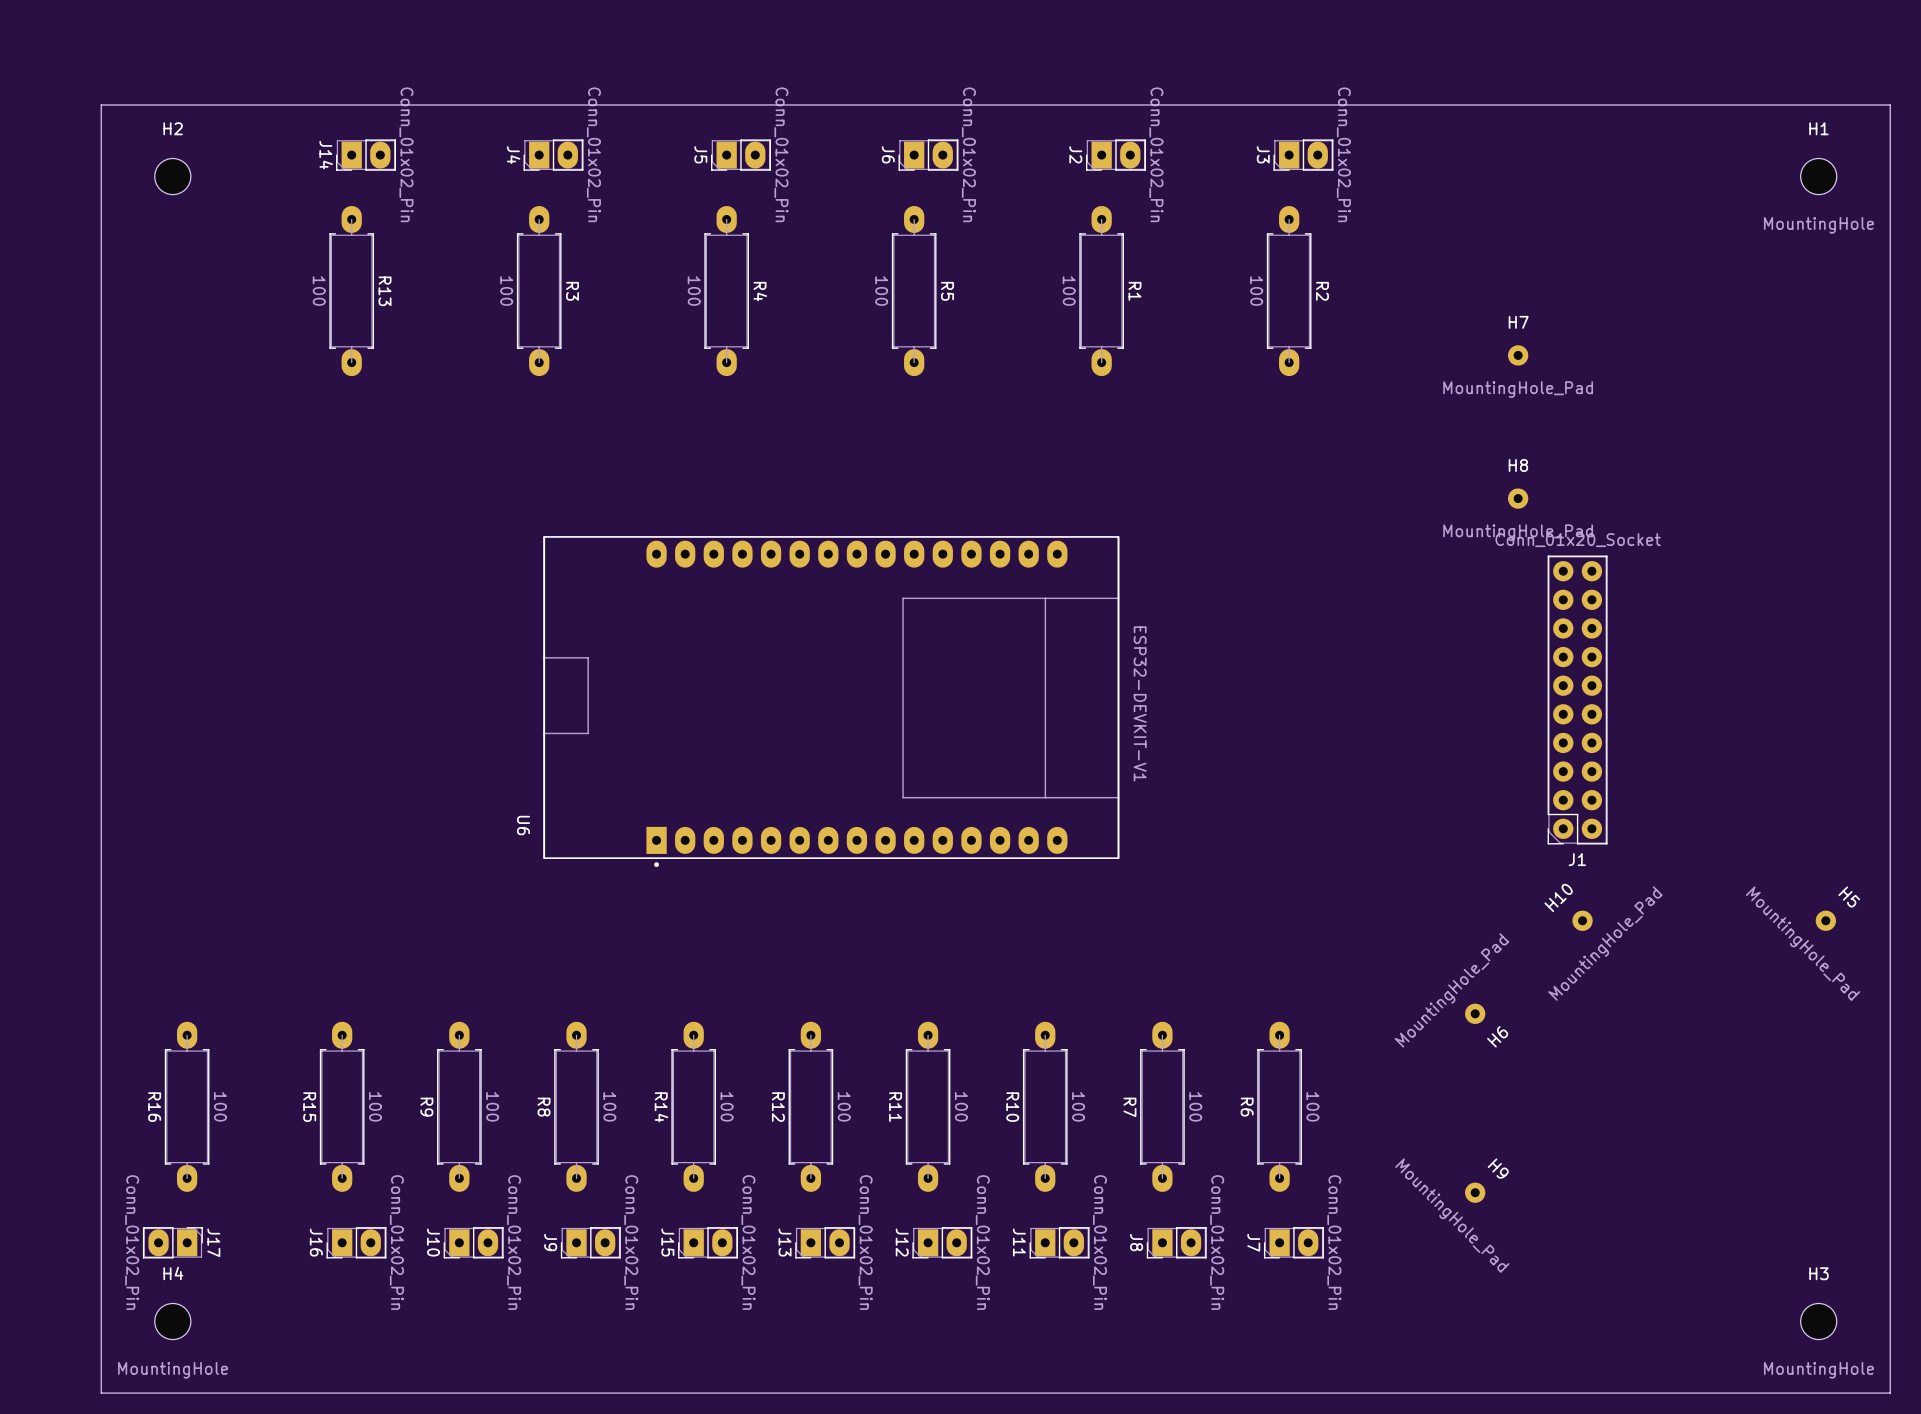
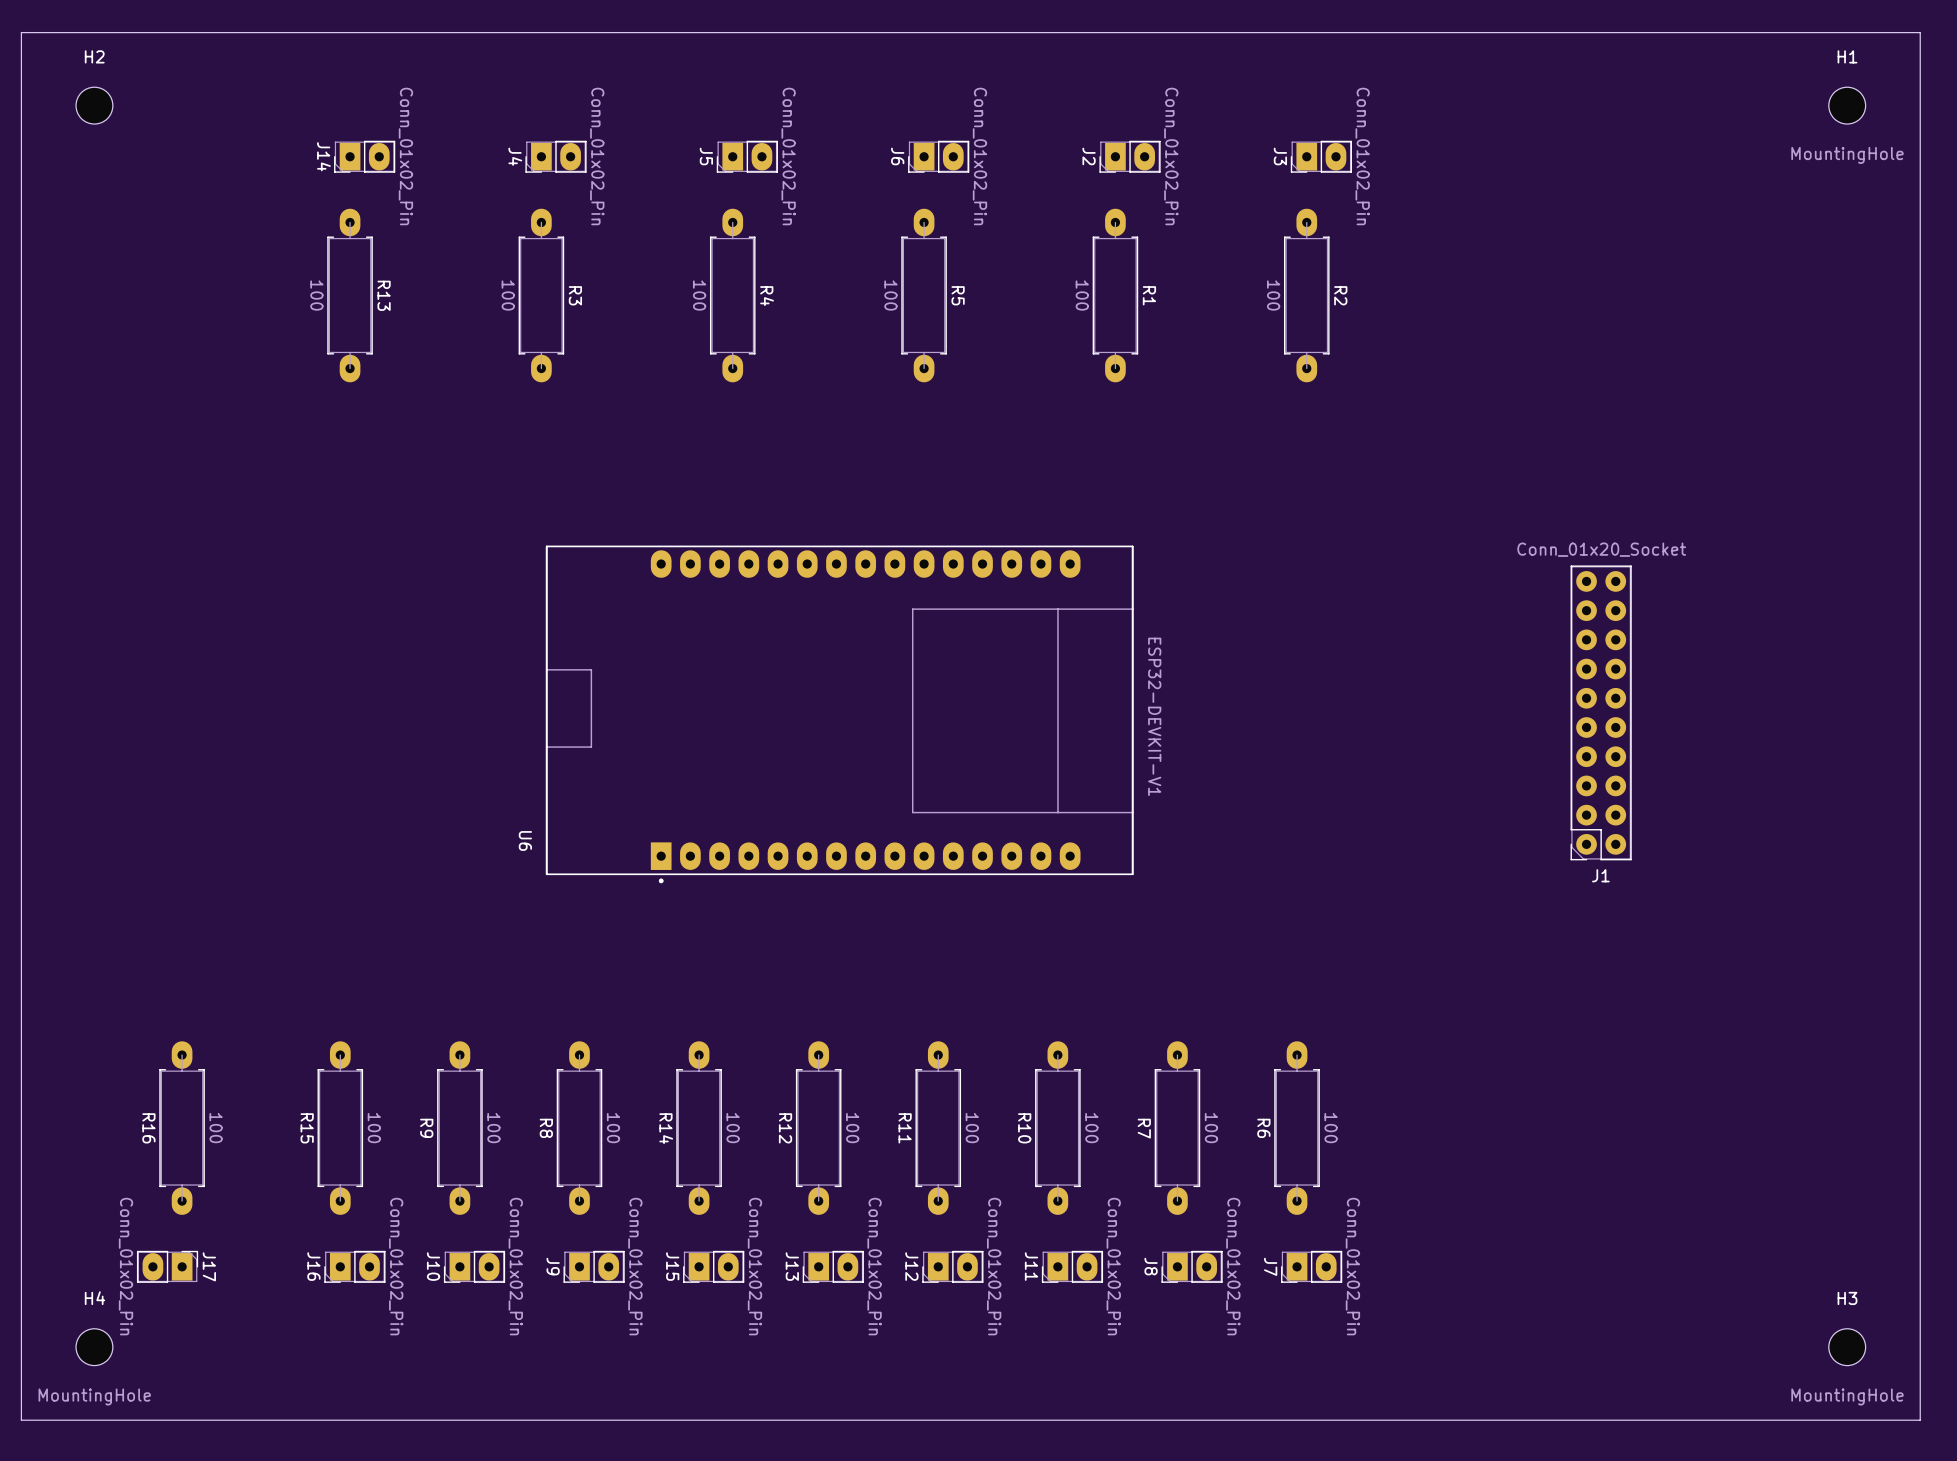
board edge: (1890, 104) (101, 104) (101, 1393) -> (1920, 105) (1920, 32) (21, 32) (21, 1420) (94, 1420)
H2 position: (172, 176) -> (94, 105)
H1 position: (1818, 176) -> (1847, 105)
H7: MountingHole_Pad (1518, 355) -> none
H8: MountingHole_Pad (1518, 498) -> none
H10: MountingHole_Pad (1582, 920) -> none
H5: MountingHole_Pad (1825, 920) -> none
H6: MountingHole_Pad (1475, 1013) -> none
H9: MountingHole_Pad (1475, 1192) -> none
H4 position: (172, 1321) -> (94, 1347)

